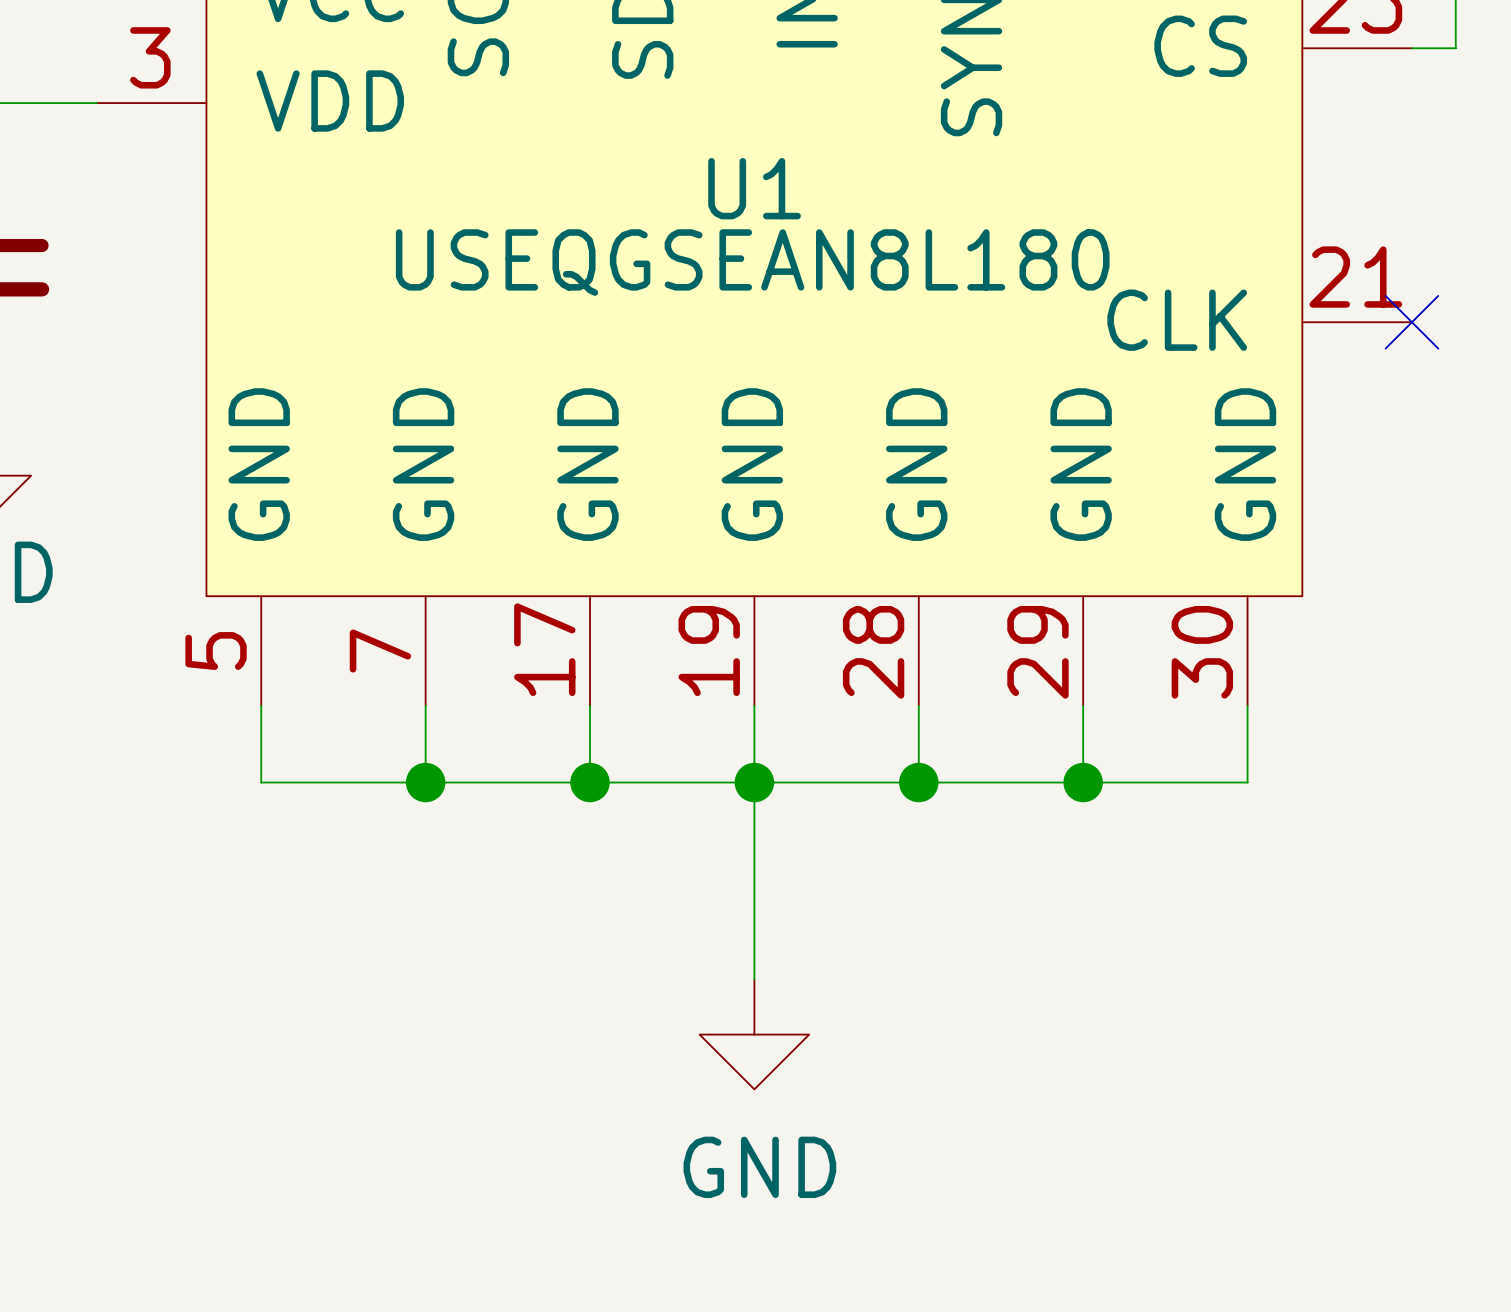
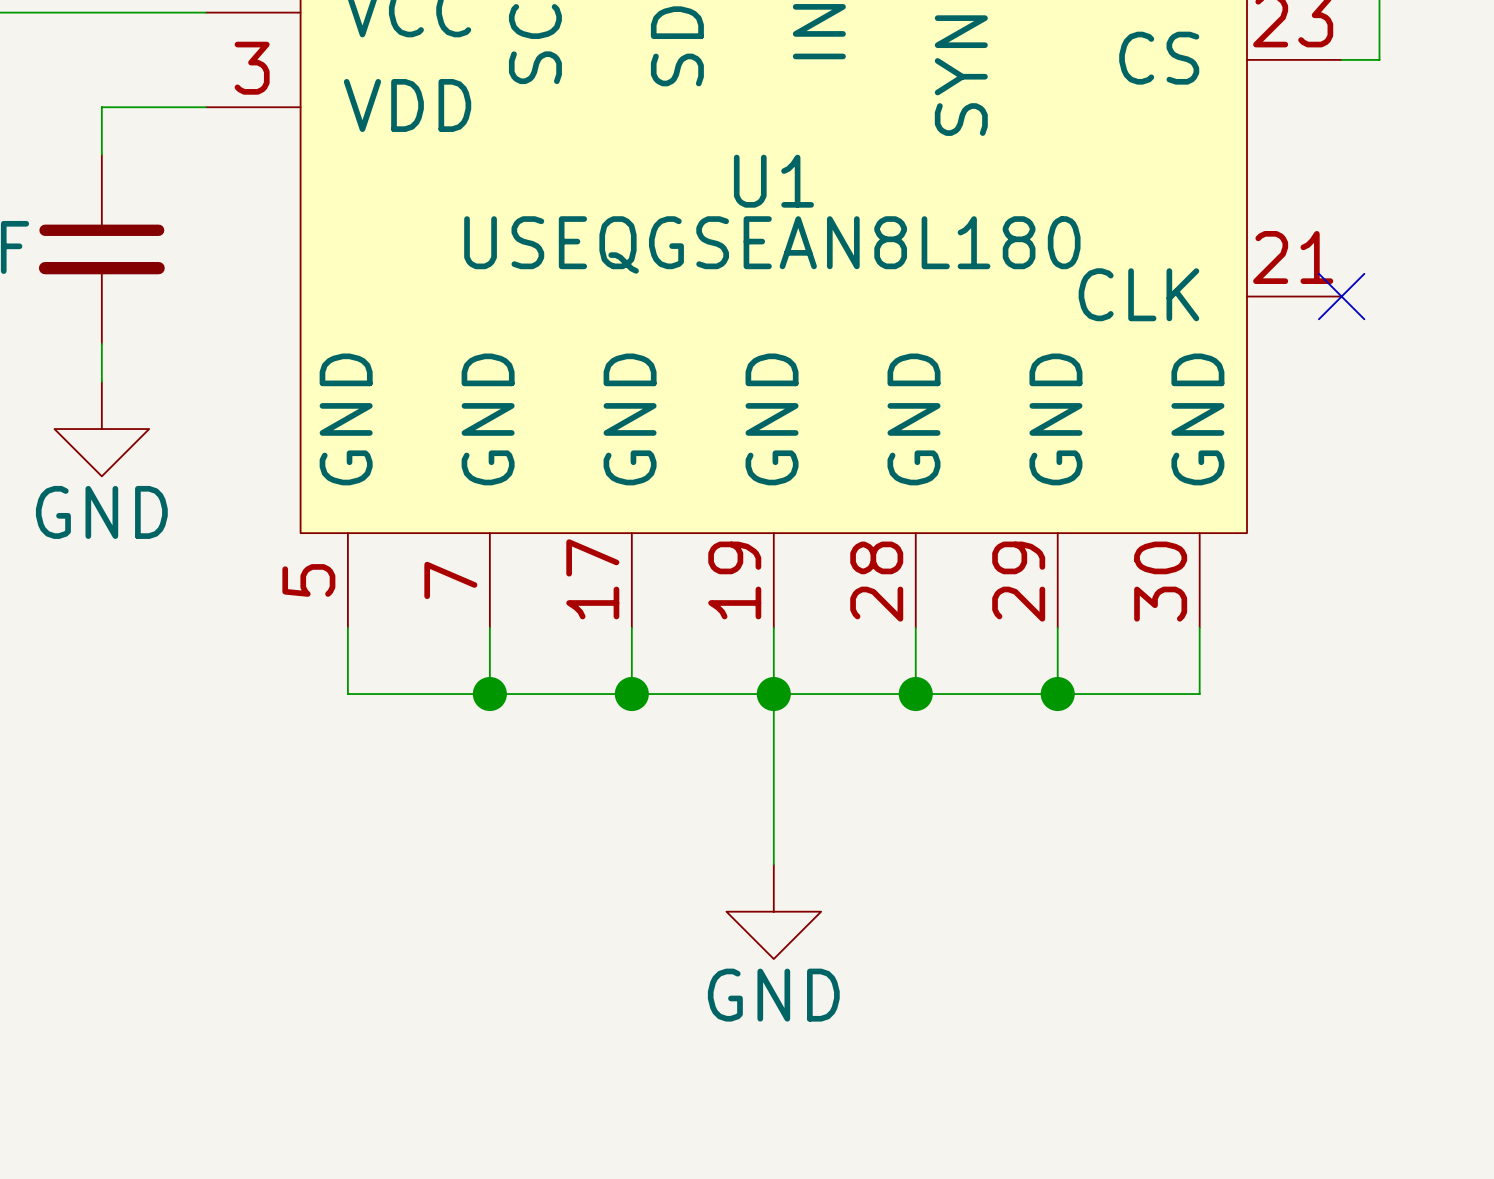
power symbol text position: GND (759, 1167) -> GND (773, 995)

